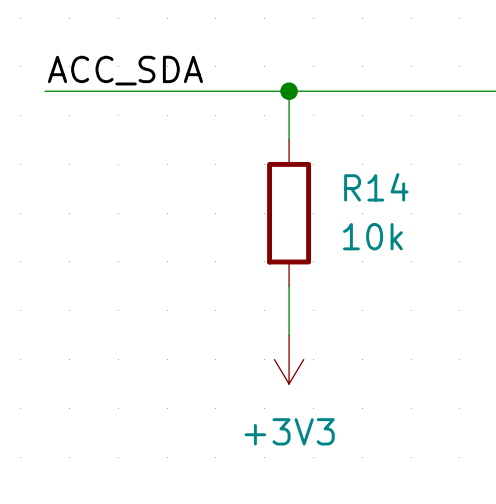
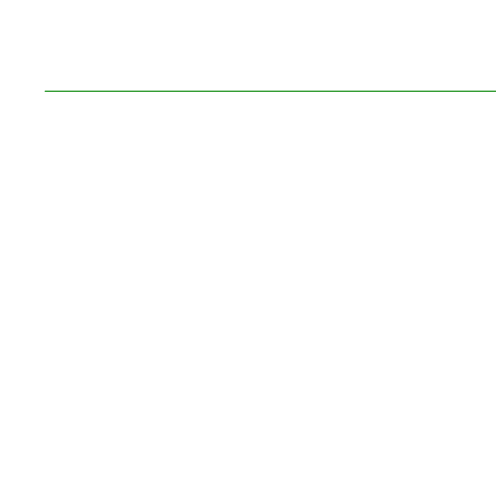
label: ACC_SDA (125, 70) -> none
wire: (289, 91) (289, 140) -> none
junction: (289, 91) -> none
R14: 10k (289, 213) -> none
wire: (289, 286) (289, 335) -> none
power symbol: +3V3 (289, 359) -> none

